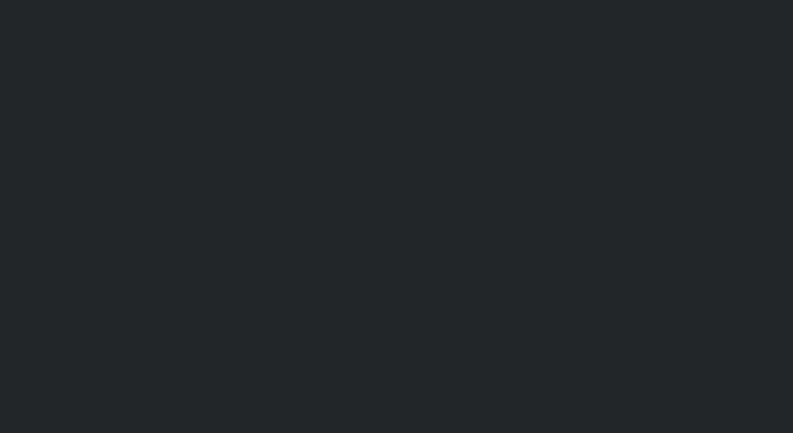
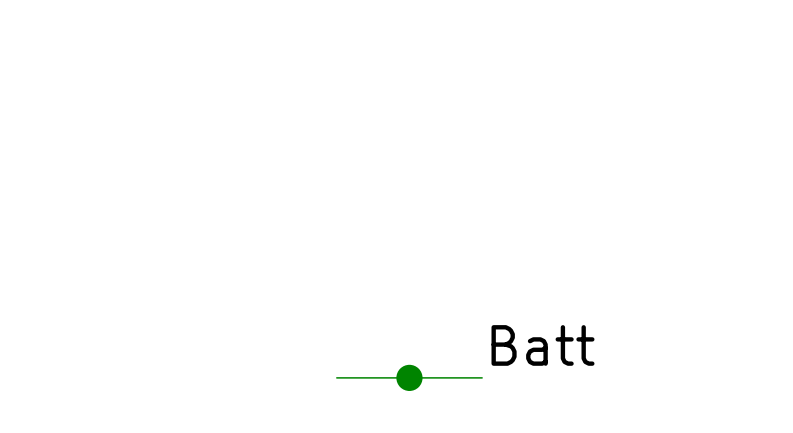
label: none -> Batt (543, 345)
wire: none -> (336, 377) (482, 377)
junction: none -> (409, 377)

